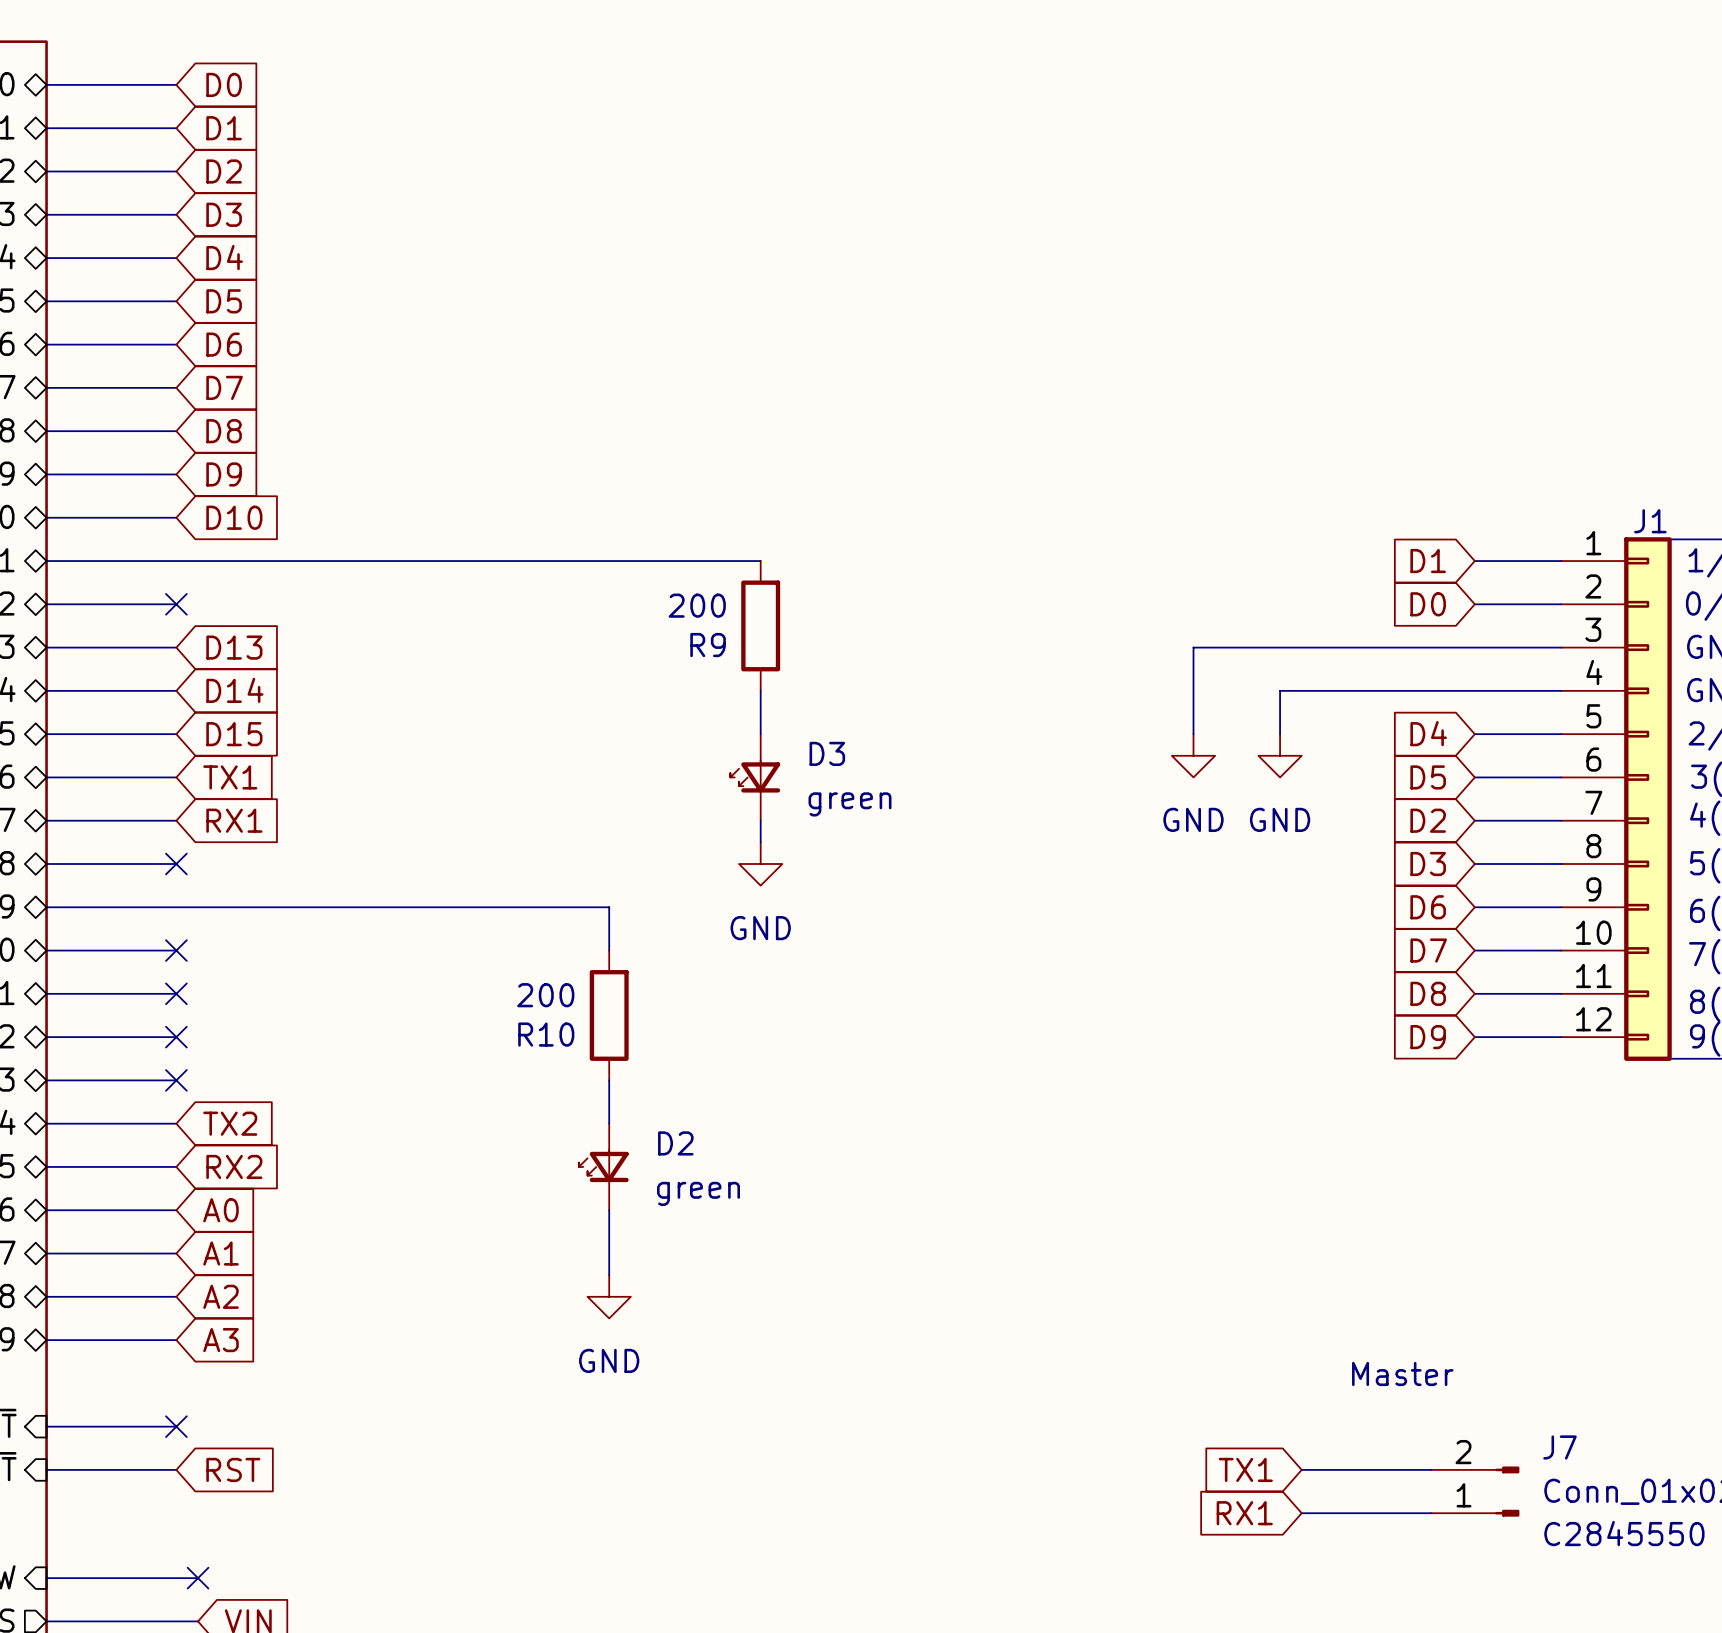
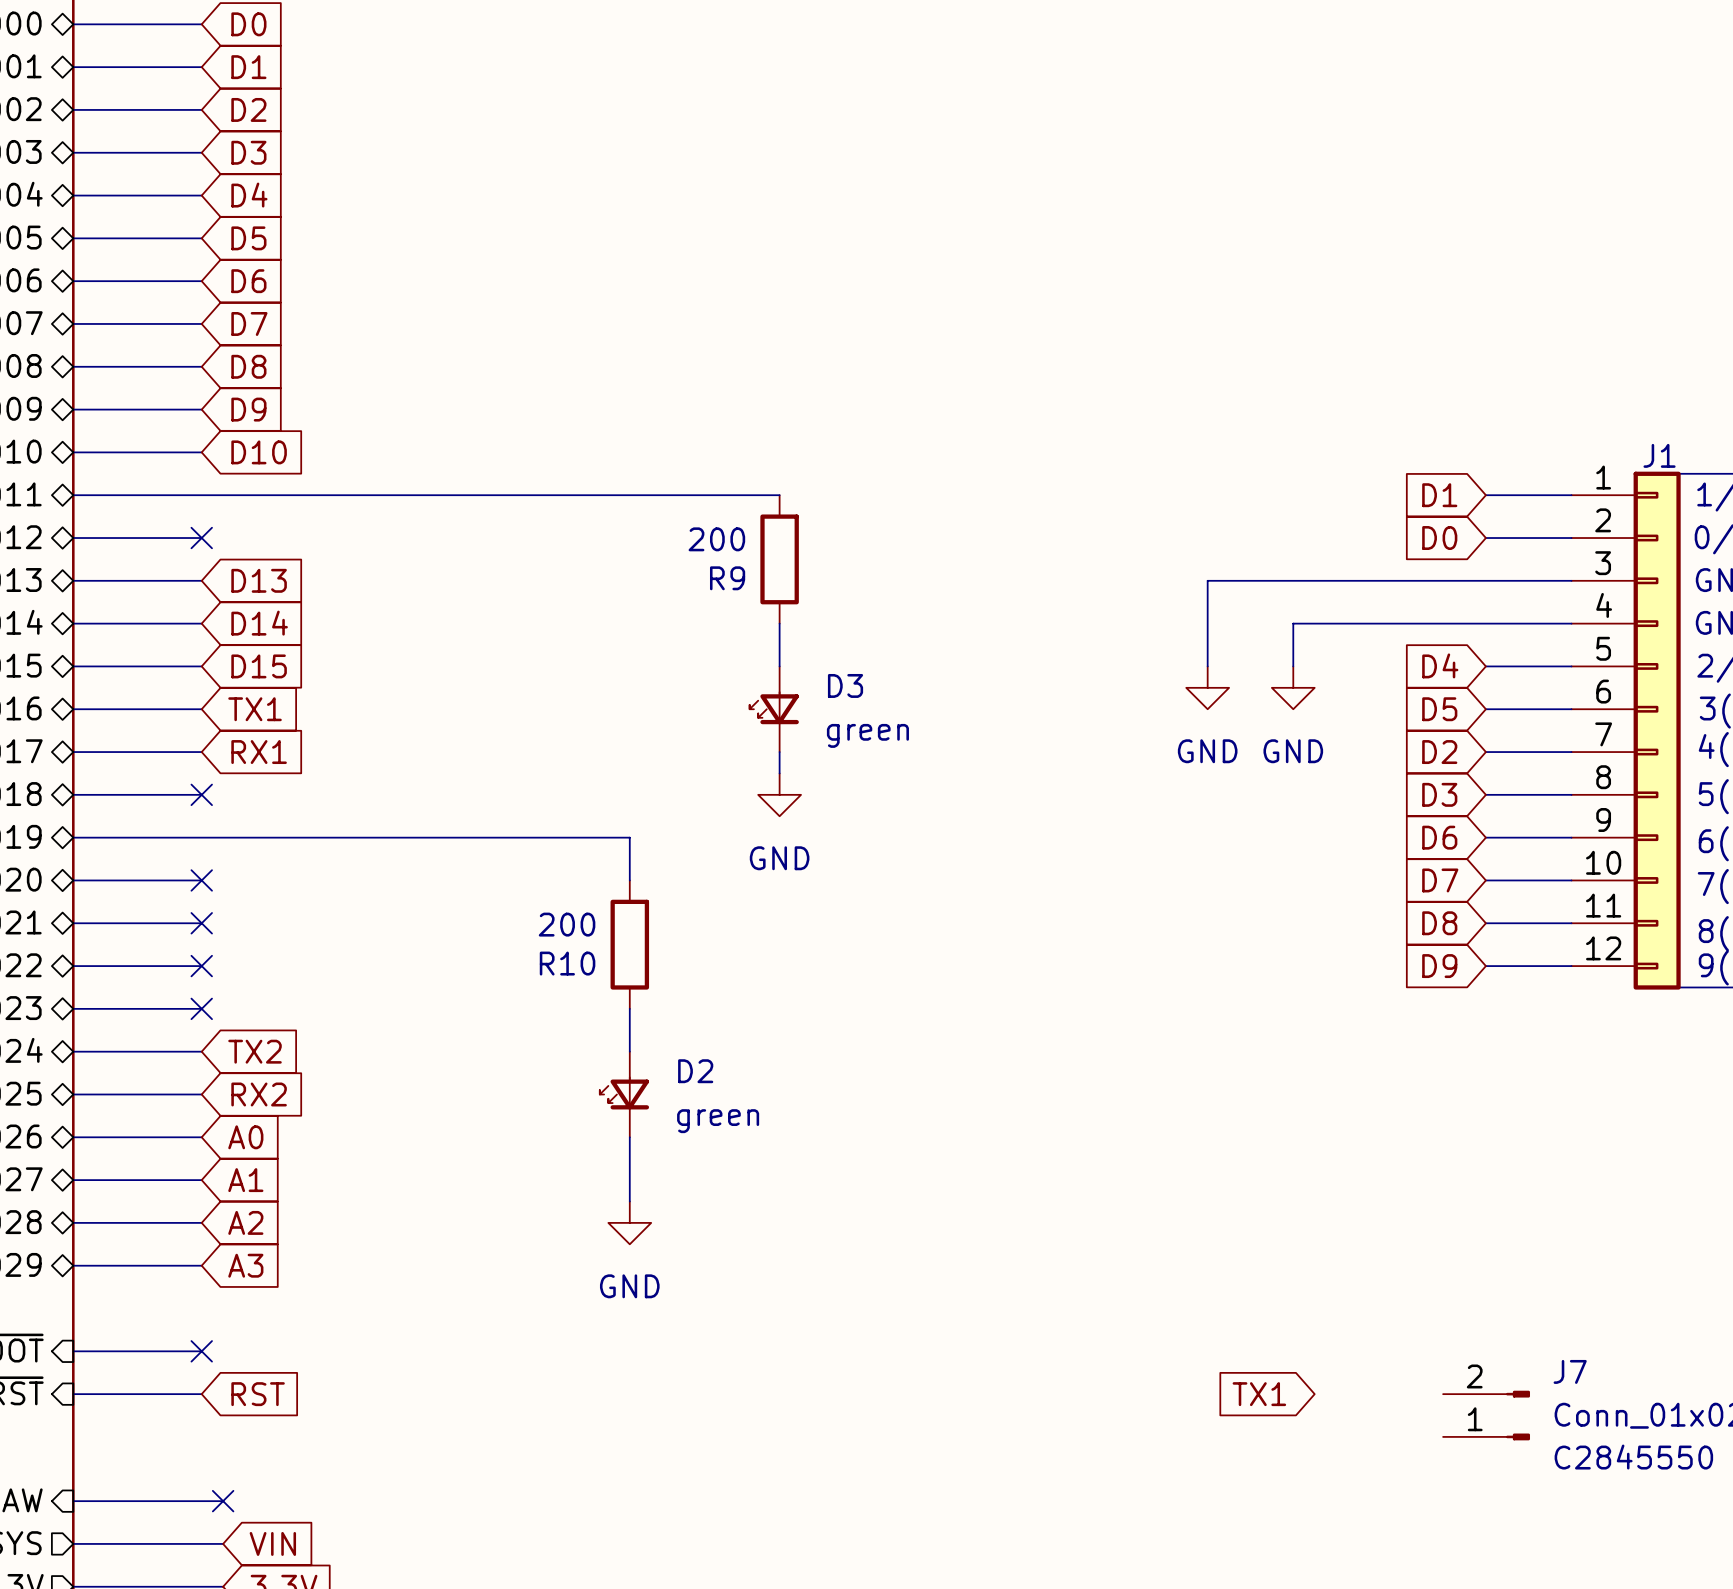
text: Master (1402, 1373) -> none
wire: (1301, 1469) (1431, 1469) -> none
global label: RX1 (1244, 1513) -> none
wire: (1301, 1513) (1431, 1513) -> none

